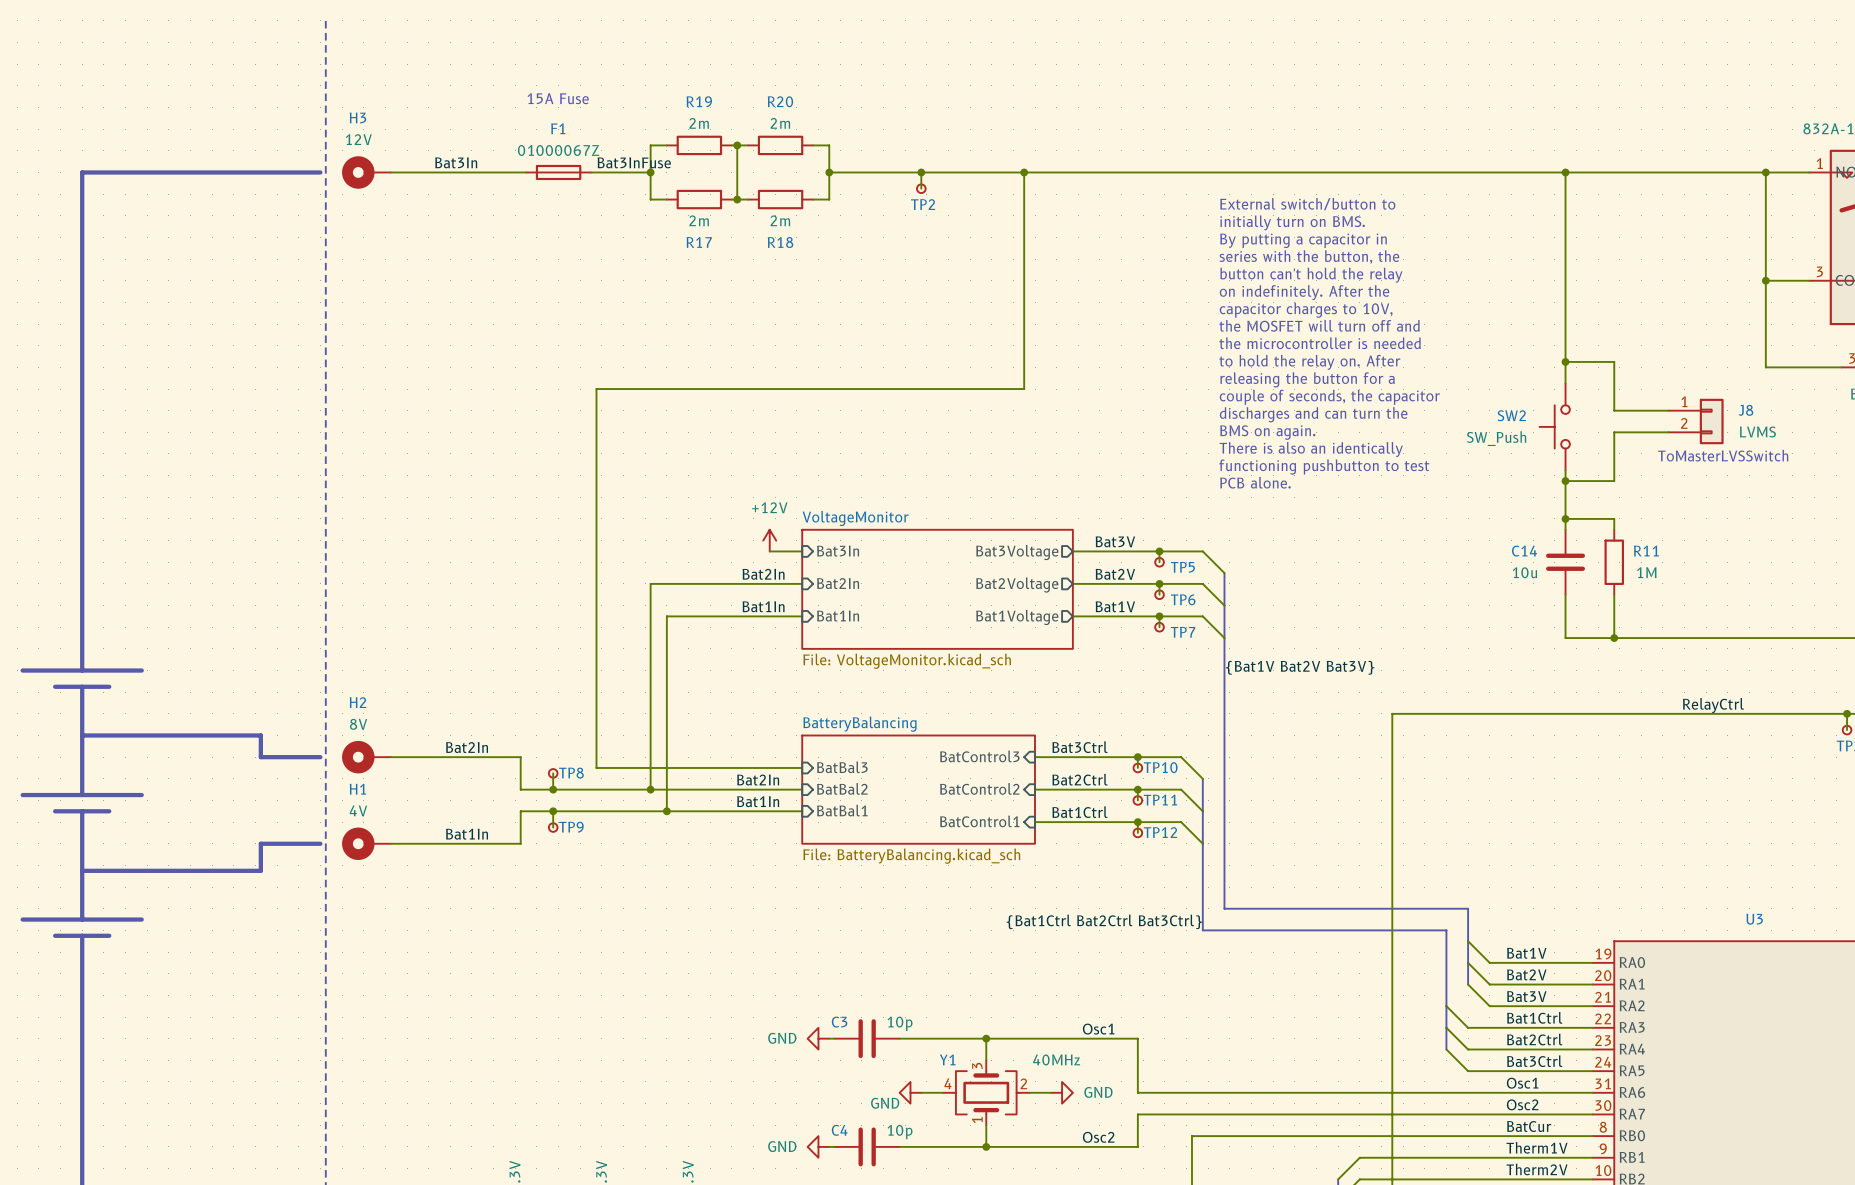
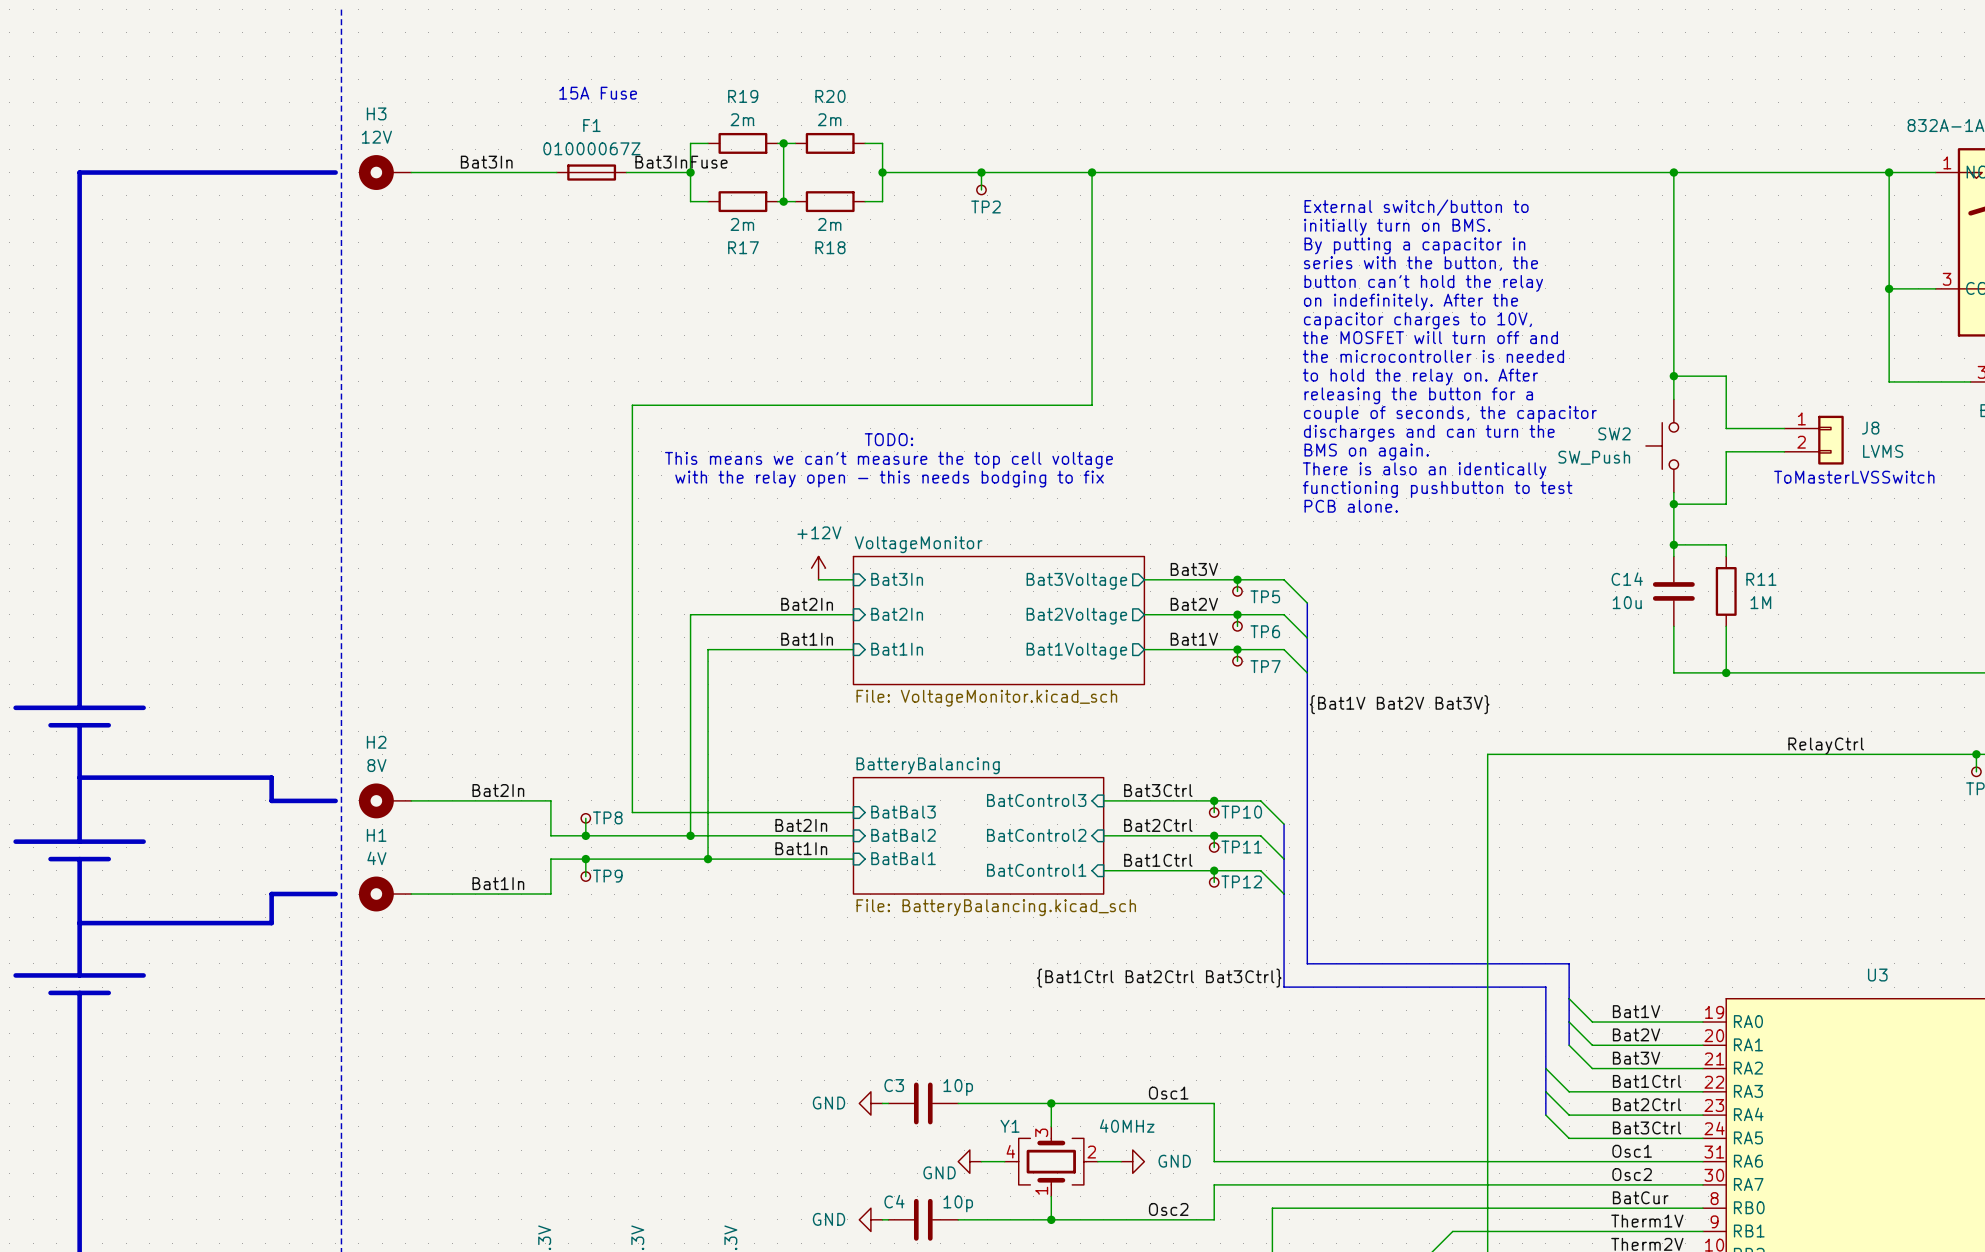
text: none -> TODO: (888, 439)
text: none -> This means we can't measure the top cell voltage (888, 460)
text: none -> with the relay open - this needs bodging to fix (889, 479)

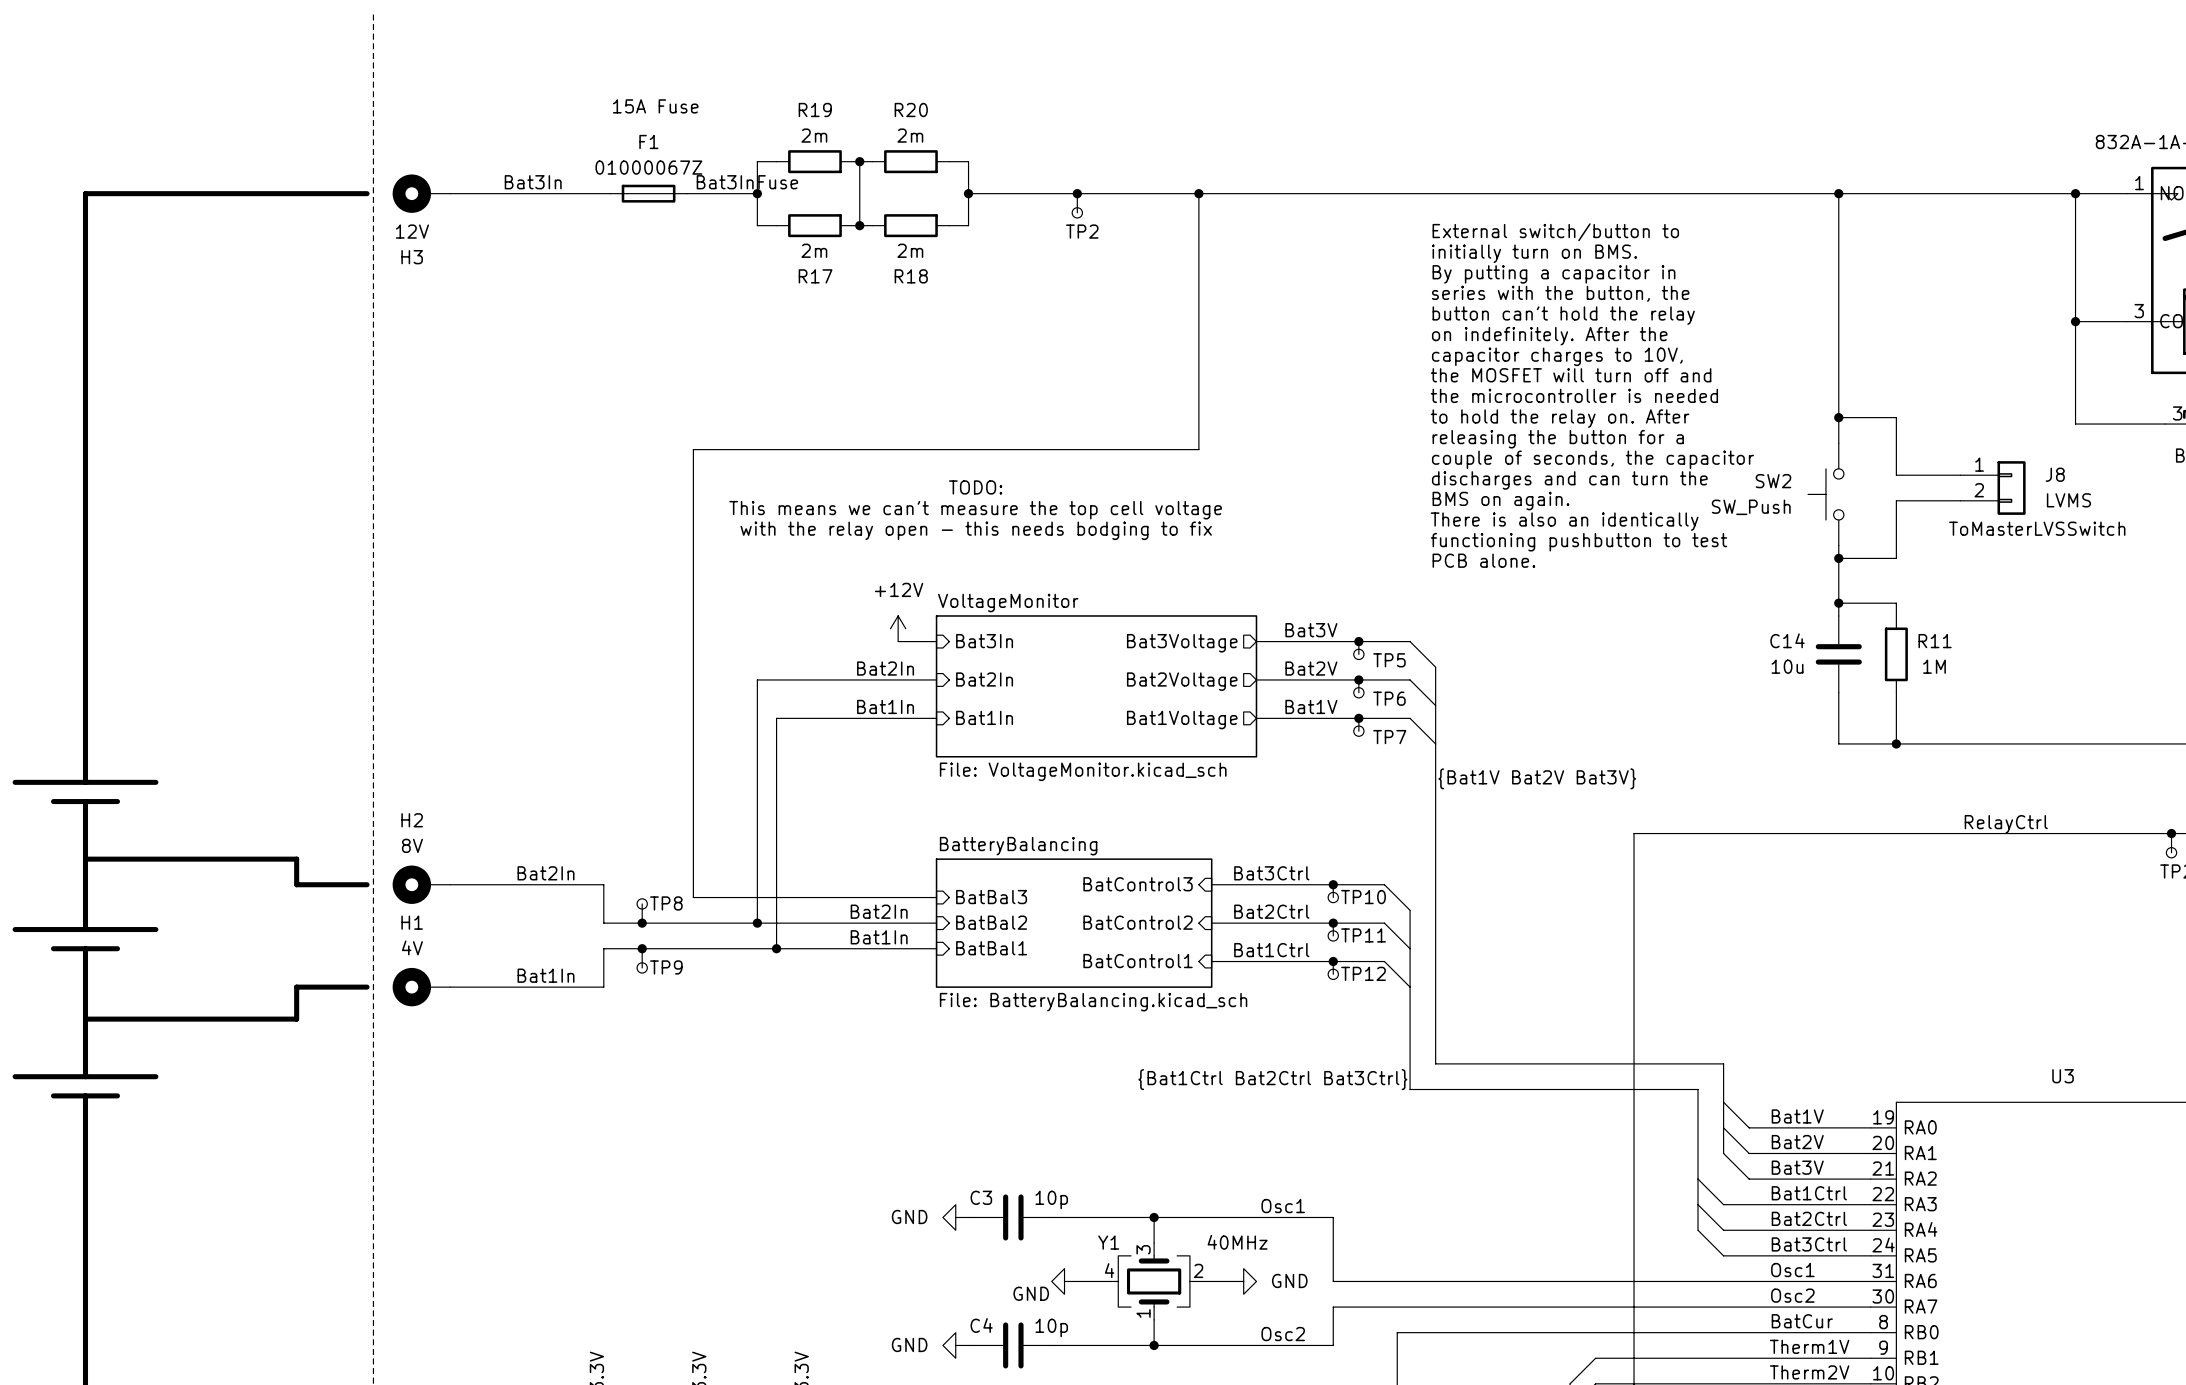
H3 name position: H3 (376, 113) -> H3 (412, 257)
H3 value position: 12V (376, 137) -> 12V (412, 231)

